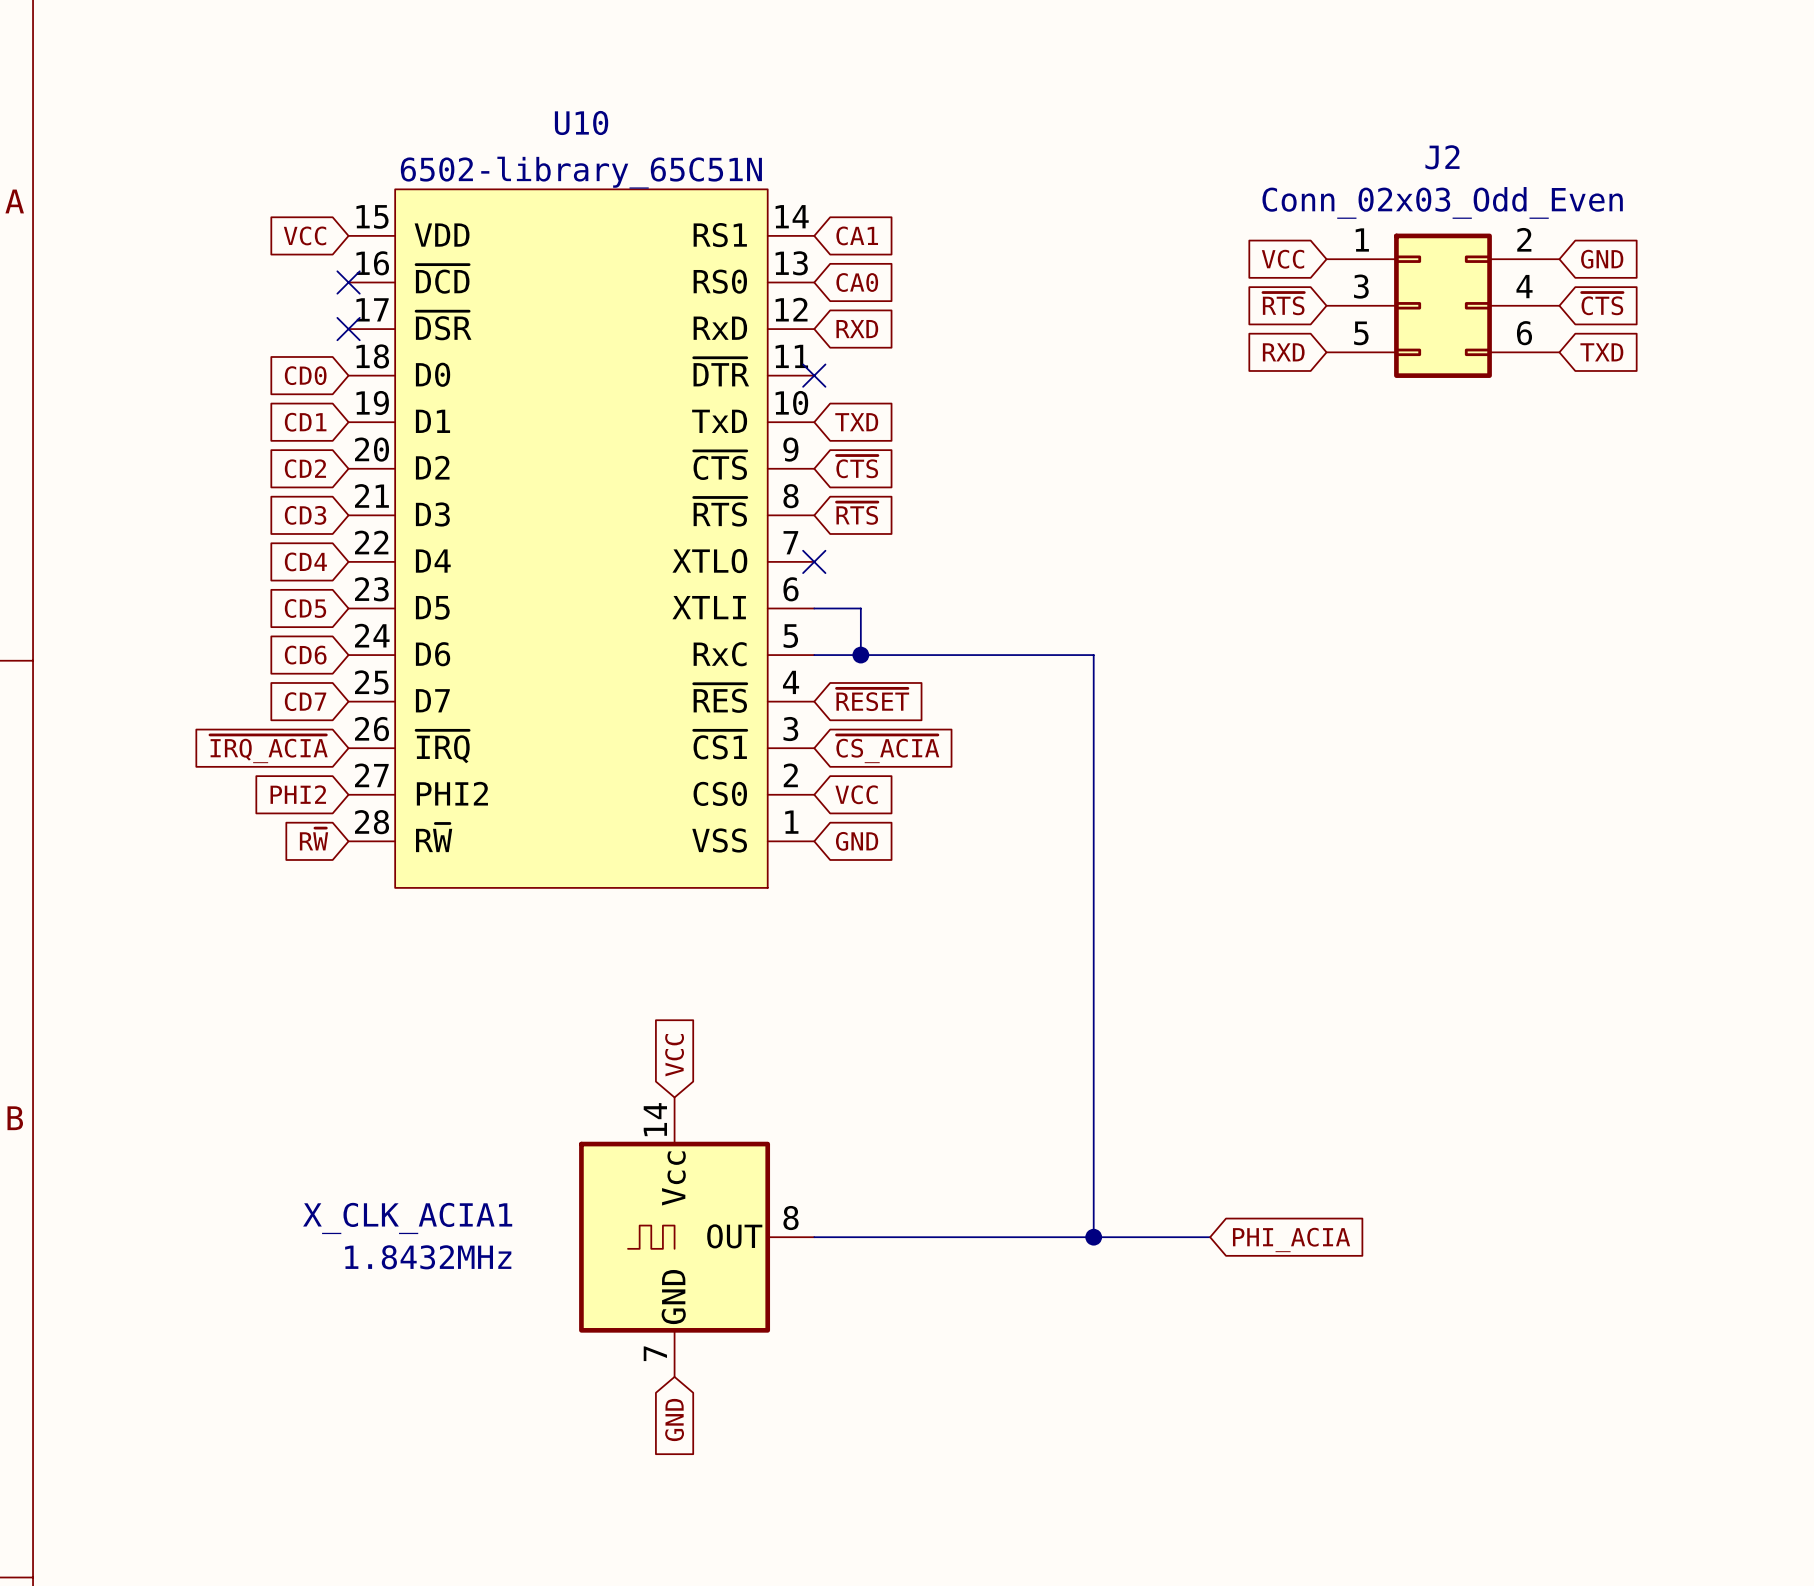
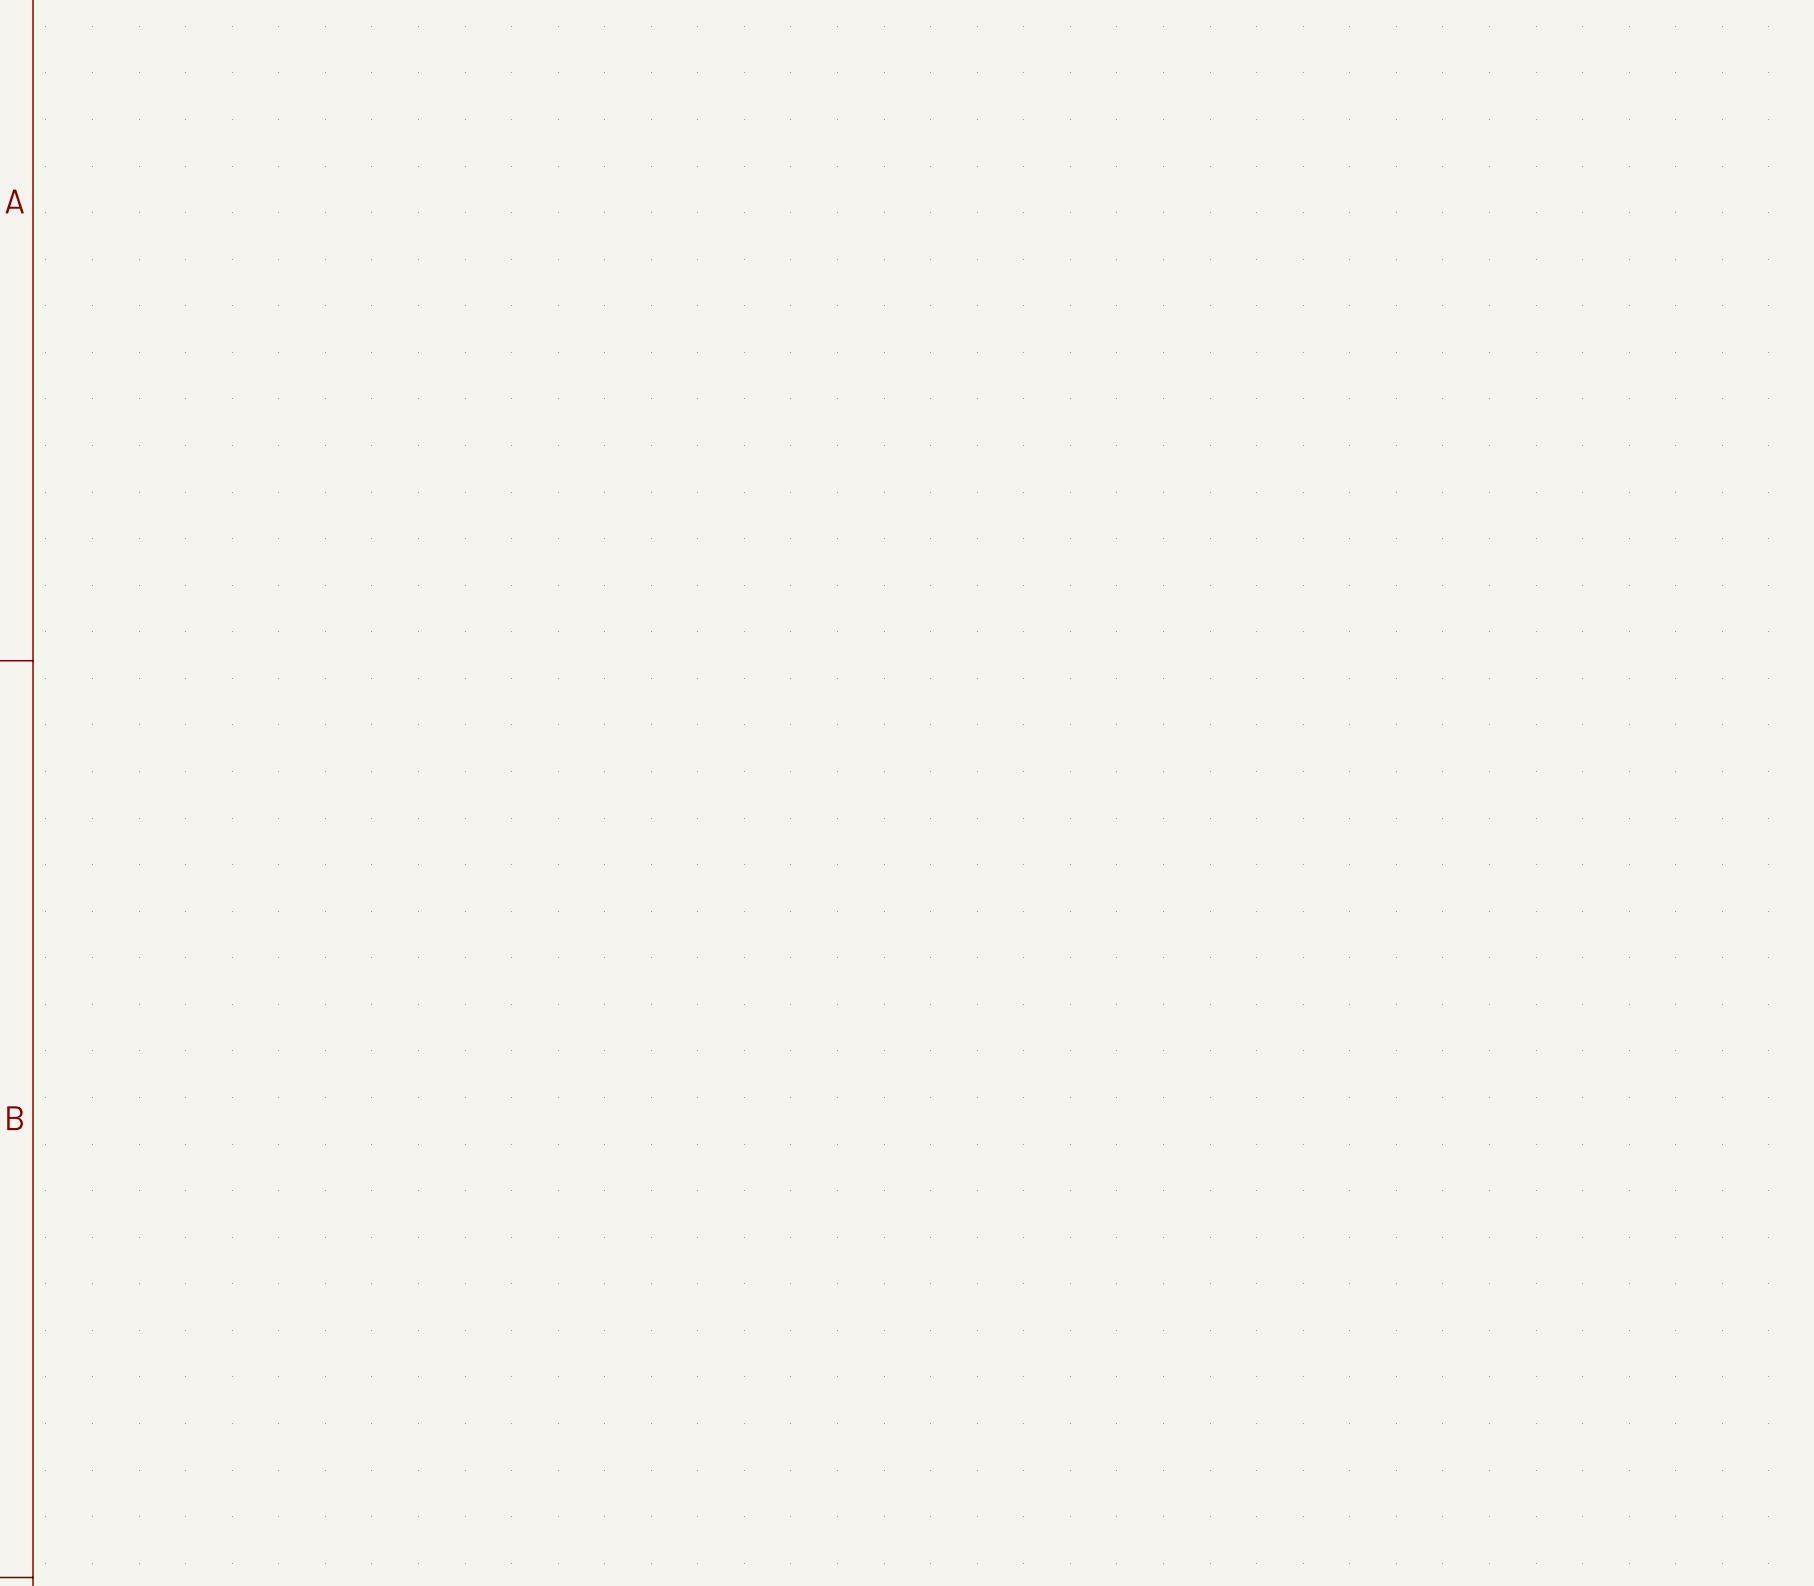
global label: VCC (305, 235) -> none
global label: CA1 (857, 235) -> none
global label: VCC (1283, 259) -> none
global label: GND (1602, 259) -> none
no-connect mark: (348, 282) -> none
global label: CA0 (857, 282) -> none
global label: ~{RTS} (1283, 303) -> none
global label: ~{CTS} (1602, 303) -> none
J2: Conn_02x03_Odd_Even (1442, 305) -> none
no-connect mark: (348, 329) -> none
global label: RXD (857, 329) -> none
global label: RXD (1283, 352) -> none
global label: TXD (1601, 352) -> none
global label: CD0 (305, 375) -> none
no-connect mark: (814, 375) -> none
global label: CD1 (305, 422) -> none
global label: TXD (856, 422) -> none
global label: ~{CTS} (857, 466) -> none
global label: CD2 (305, 468) -> none
global label: ~{RTS} (857, 513) -> none
global label: CD3 (305, 515) -> none
U10: 6502-library_65C51N (581, 538) -> none
global label: CD4 (305, 561) -> none
no-connect mark: (814, 561) -> none
global label: CD5 (305, 608) -> none
wire: (814, 608) (860, 608) (860, 655) -> none
global label: CD6 (305, 655) -> none
wire: (814, 655) (1093, 655) (1093, 1237) -> none
junction: (860, 655) -> none
global label: ~{RESET} (872, 699) -> none
global label: CD7 (305, 701) -> none
global label: ~{IRQ_ACIA} (268, 749) -> none
global label: ~{CS_ACIA} (887, 749) -> none
global label: PHI2 (298, 794) -> none
global label: VCC (856, 794) -> none
global label: R~{W} (314, 839) -> none
global label: GND (857, 841) -> none
global label: VCC (674, 1055) -> none
X_CLK_ACIA1: 1.8432MHz (696, 1237) -> none
wire: (814, 1237) (1210, 1237) -> none
junction: (1093, 1237) -> none
global label: PHI_ACIA (1291, 1239) -> none
global label: GND (674, 1419) -> none

